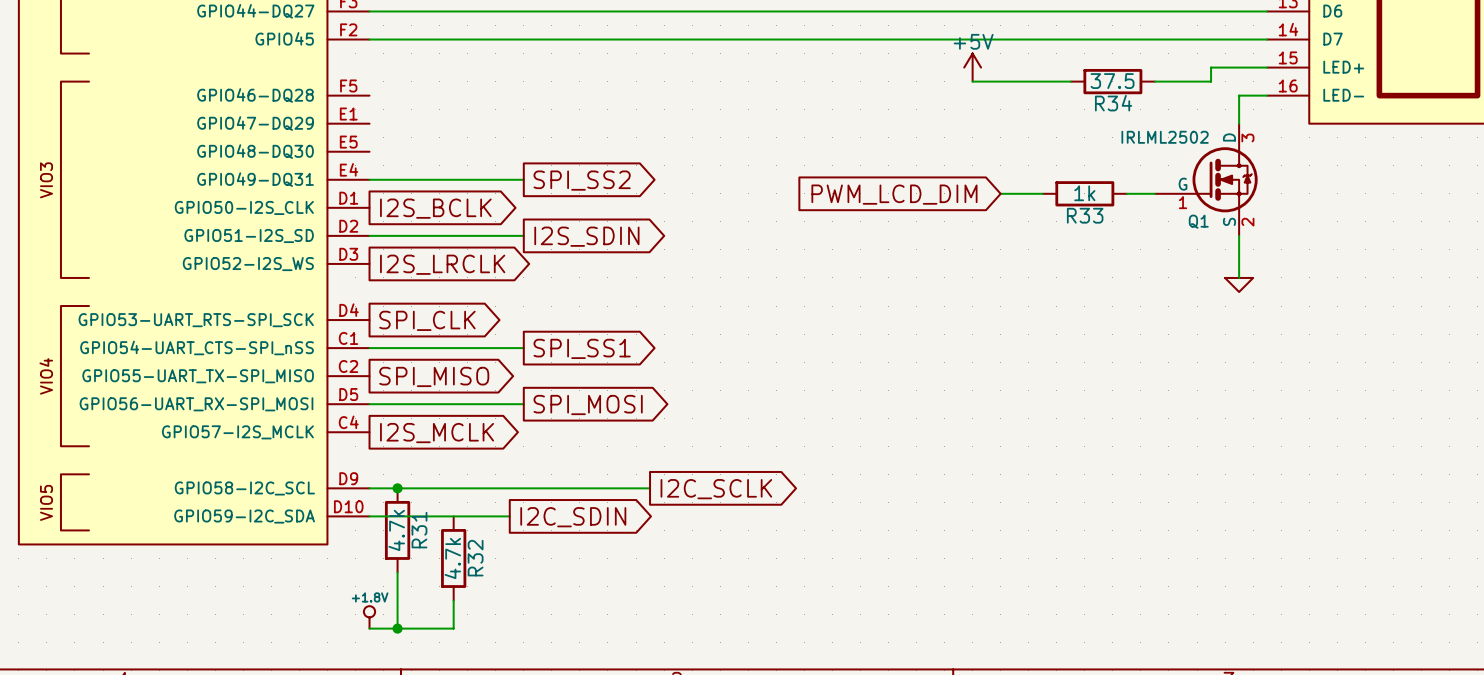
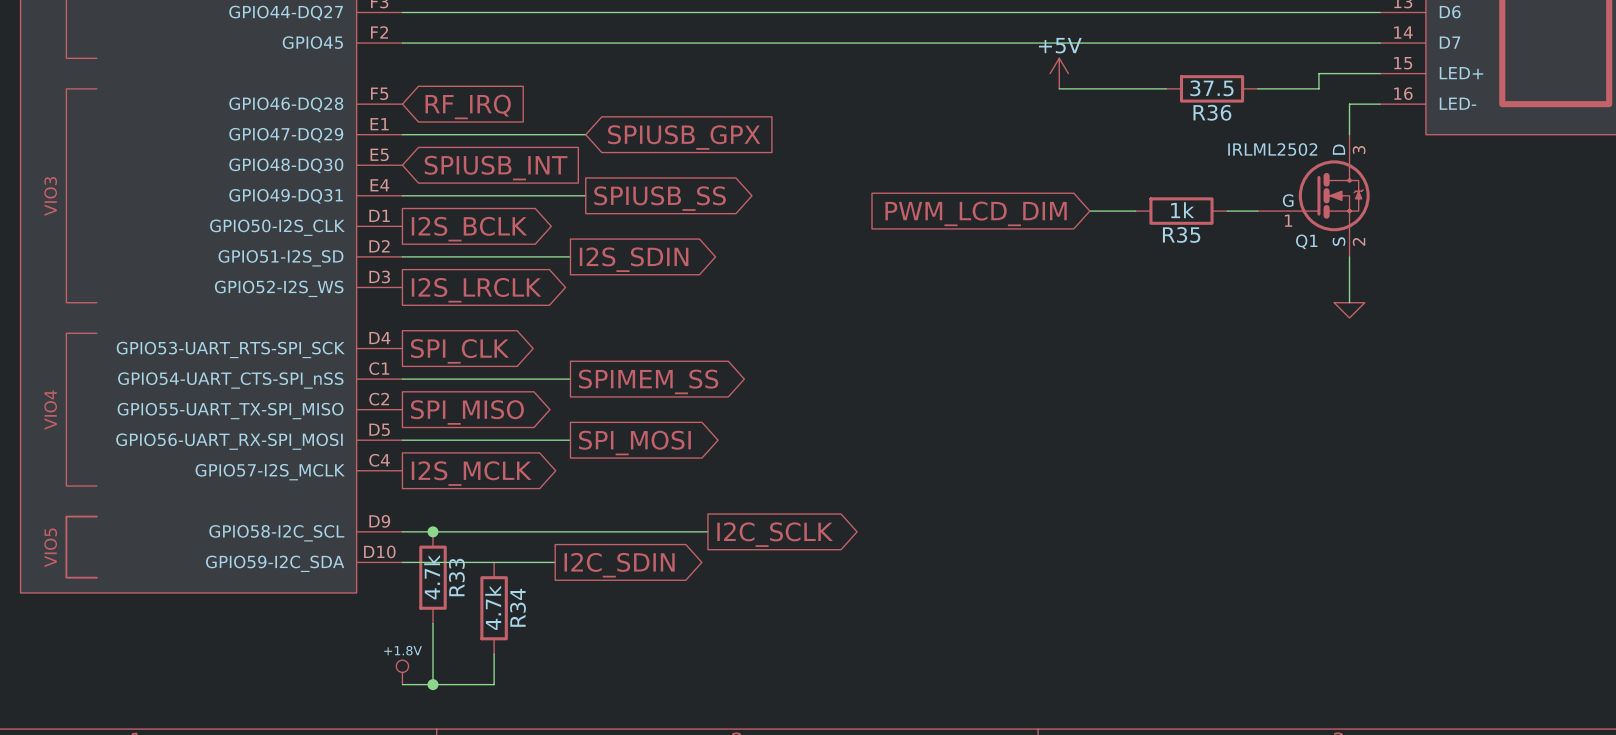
global label: none -> RF_IRQ (468, 106)
R34 name: R34 (1113, 103) -> R36 (1212, 112)
wire: none -> (402, 134) (585, 134)
global label: none -> SPIUSB_GPX (684, 137)
global label: none -> SPIUSB_INT (496, 168)
wire: none -> (570, 195) (585, 195)
global label: SPI_SS2 (582, 180) -> SPIUSB_SS (660, 198)
R33 name: R33 (1085, 215) -> R35 (1181, 234)
global label: SPI_SS1 (582, 348) -> SPIMEM_SS (648, 381)
R31 name: R31 (419, 530) -> R33 (456, 577)
R32 name: R32 (475, 558) -> R34 (517, 607)

